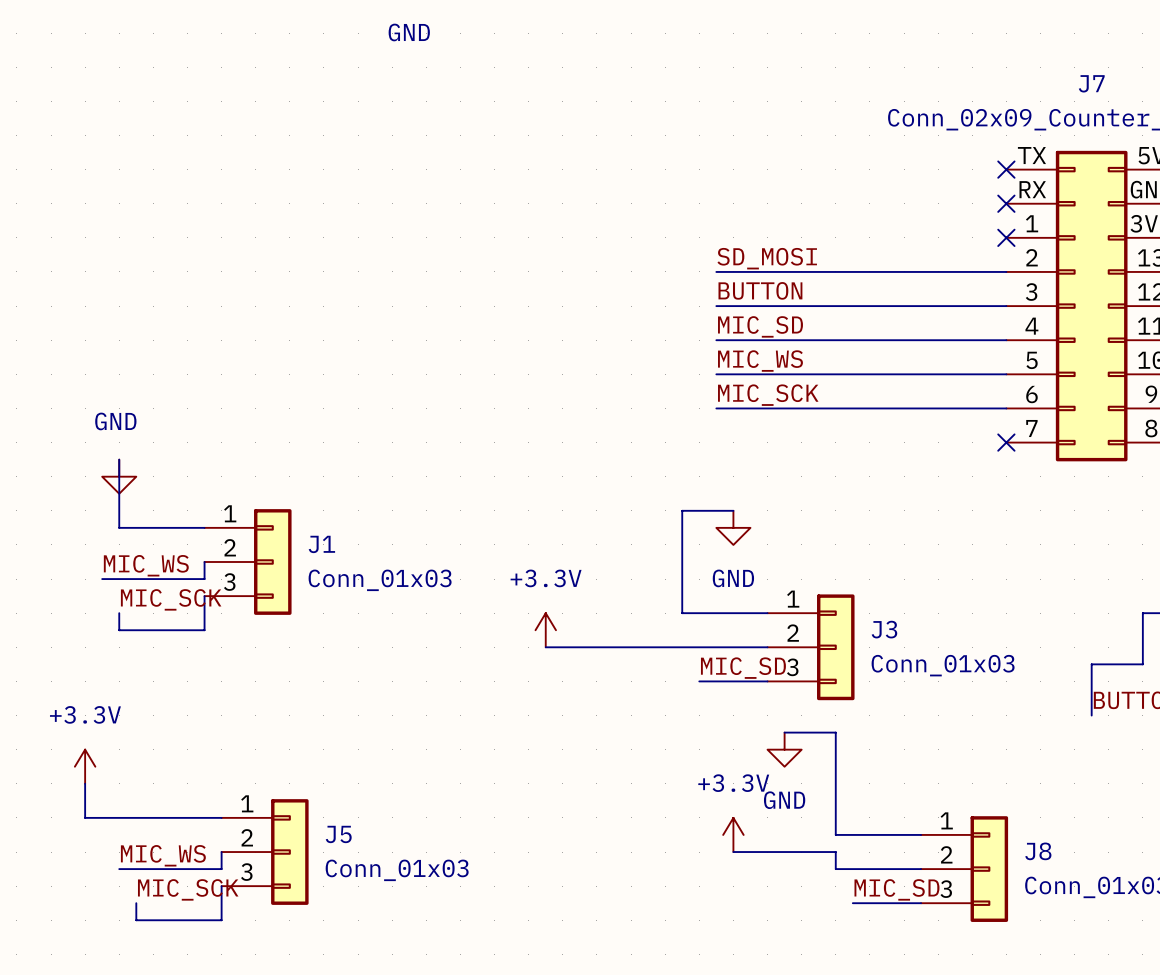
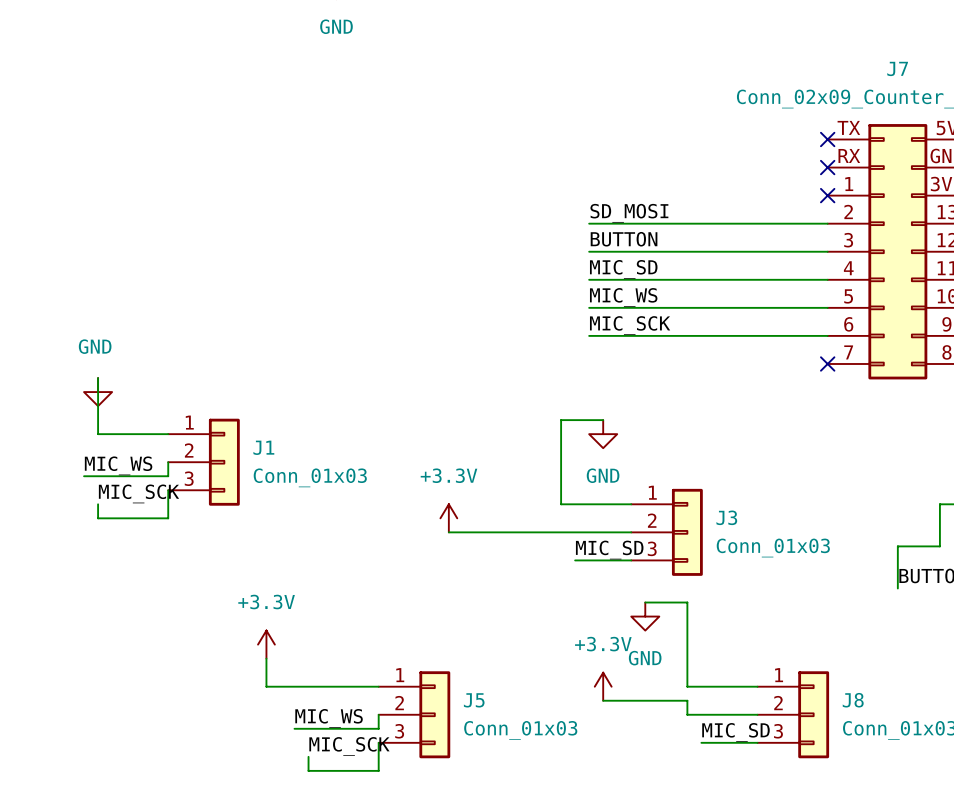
power symbol position: +3.3V (85, 766) -> +3.3V (266, 644)
wire: (85, 783) (85, 817) (221, 817) -> (266, 658) (266, 686) (378, 686)
wire: (221, 852) (221, 869) (119, 869) -> (378, 714) (378, 728) (294, 728)
J5 position: (265, 852) -> (414, 714)
label position: MIC_WS (163, 855) -> MIC_WS (329, 718)
wire: (221, 886) (221, 920) (136, 920) (136, 903) -> (378, 742) (378, 770) (308, 770) (308, 756)
label position: MIC_SCK (188, 889) -> MIC_SCK (349, 746)

